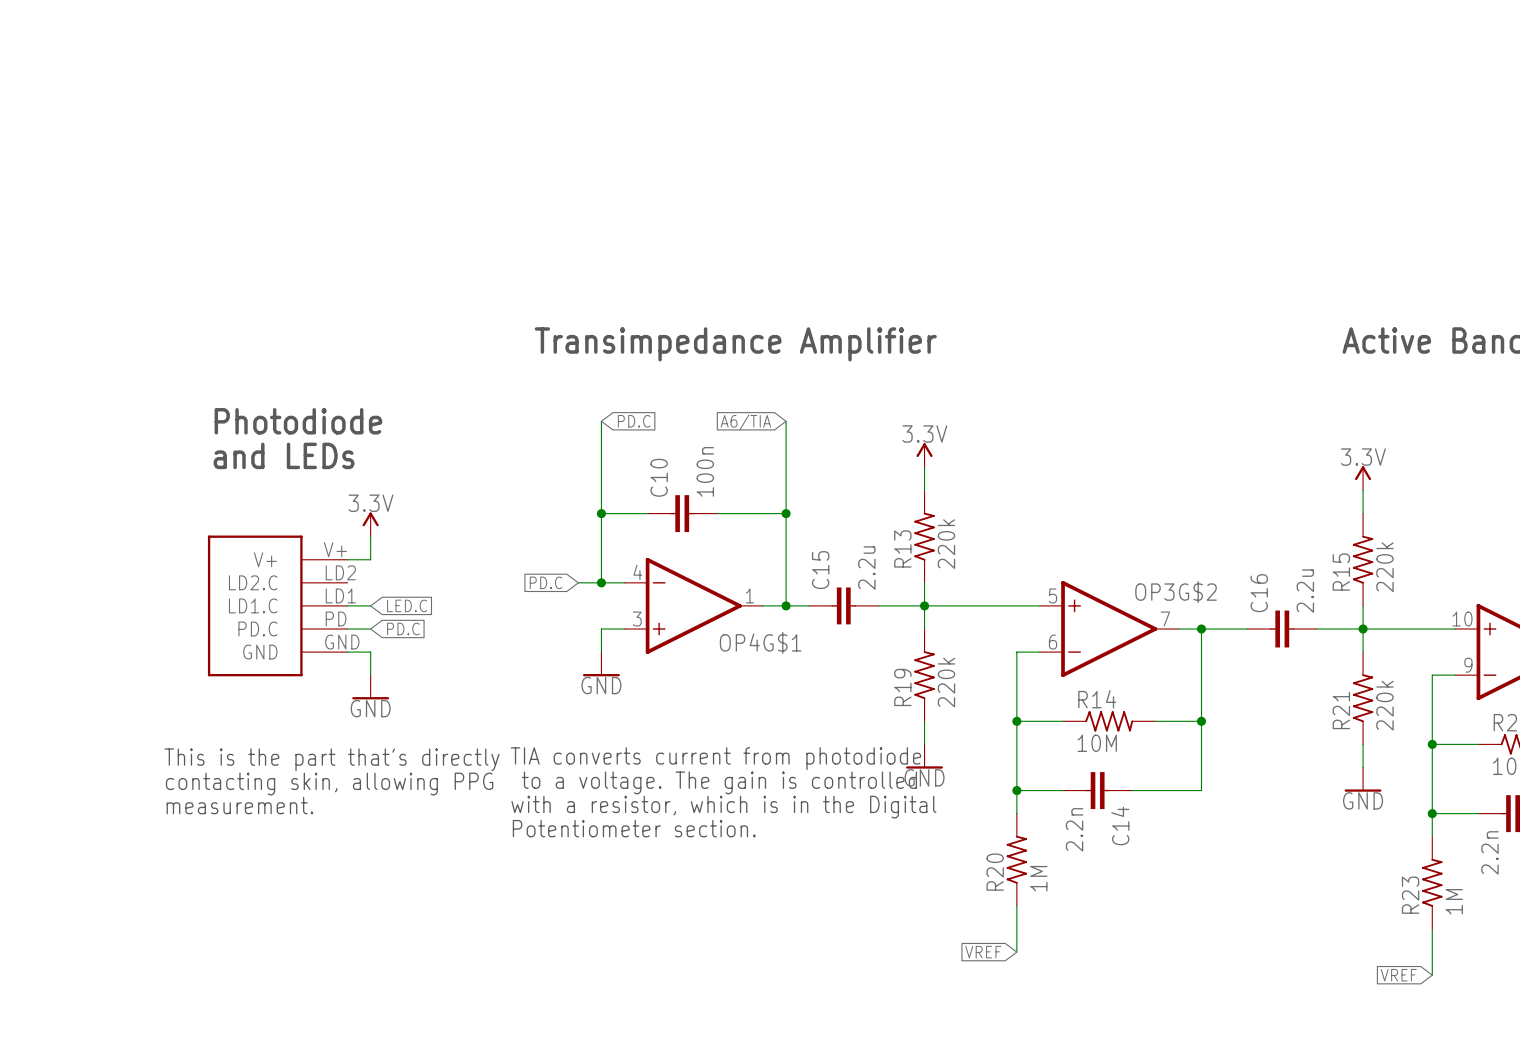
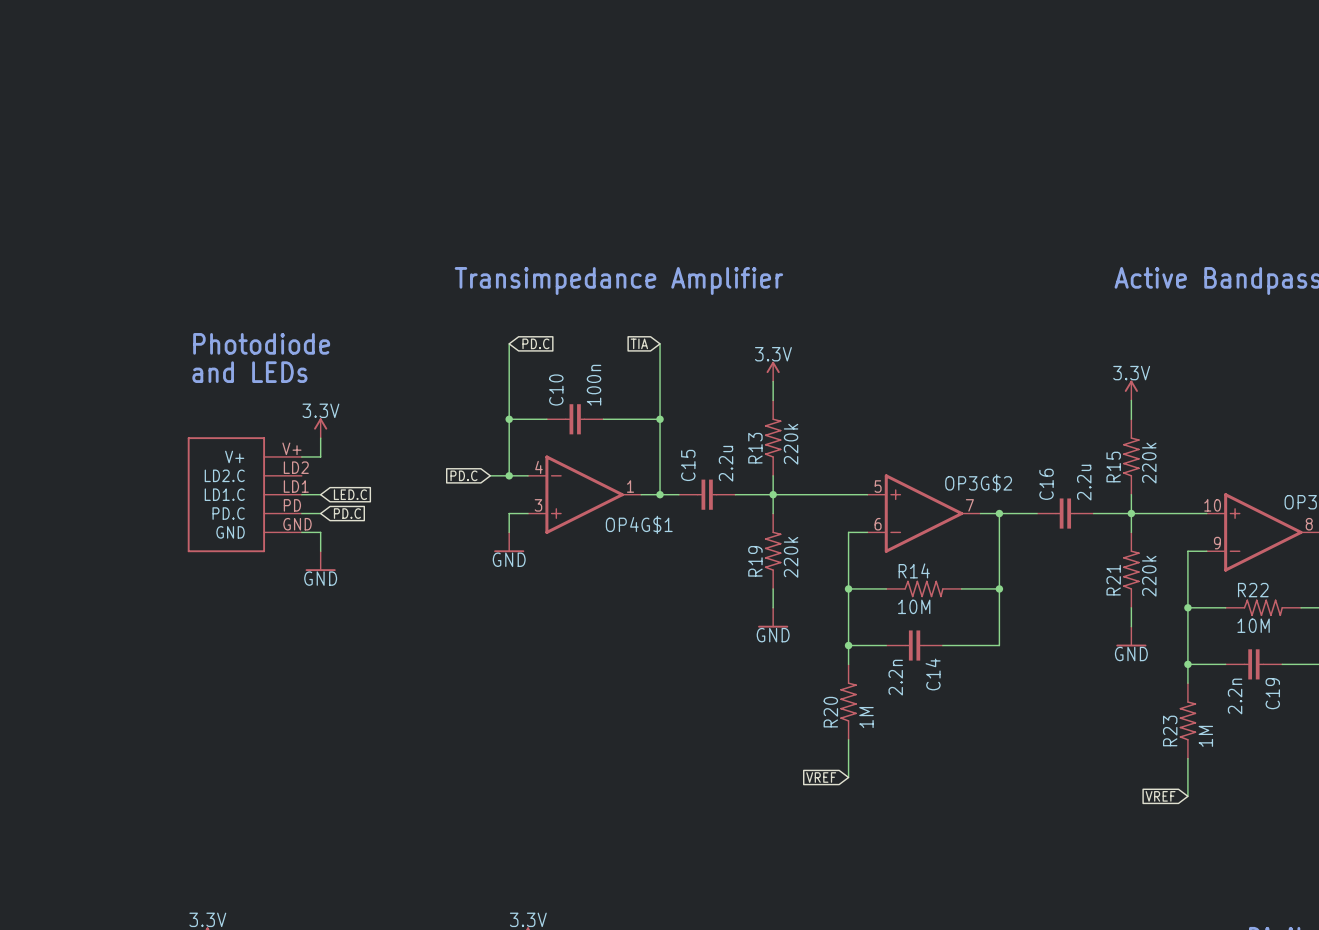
global label: A6/TIA (745, 422) -> TIA (639, 343)
text: TIA converts current from photodiode (715, 758) -> none
text: This is the part that's directly (332, 759) -> none
text: to a voltage. The gain is controlled (719, 782) -> none
text: contacting skin, allowing PPG (329, 784) -> none
text: measurement. (239, 805) -> none
text: with a resistor, which is in the Digital (723, 807) -> none
text: Potentiometer section. (634, 828) -> none

